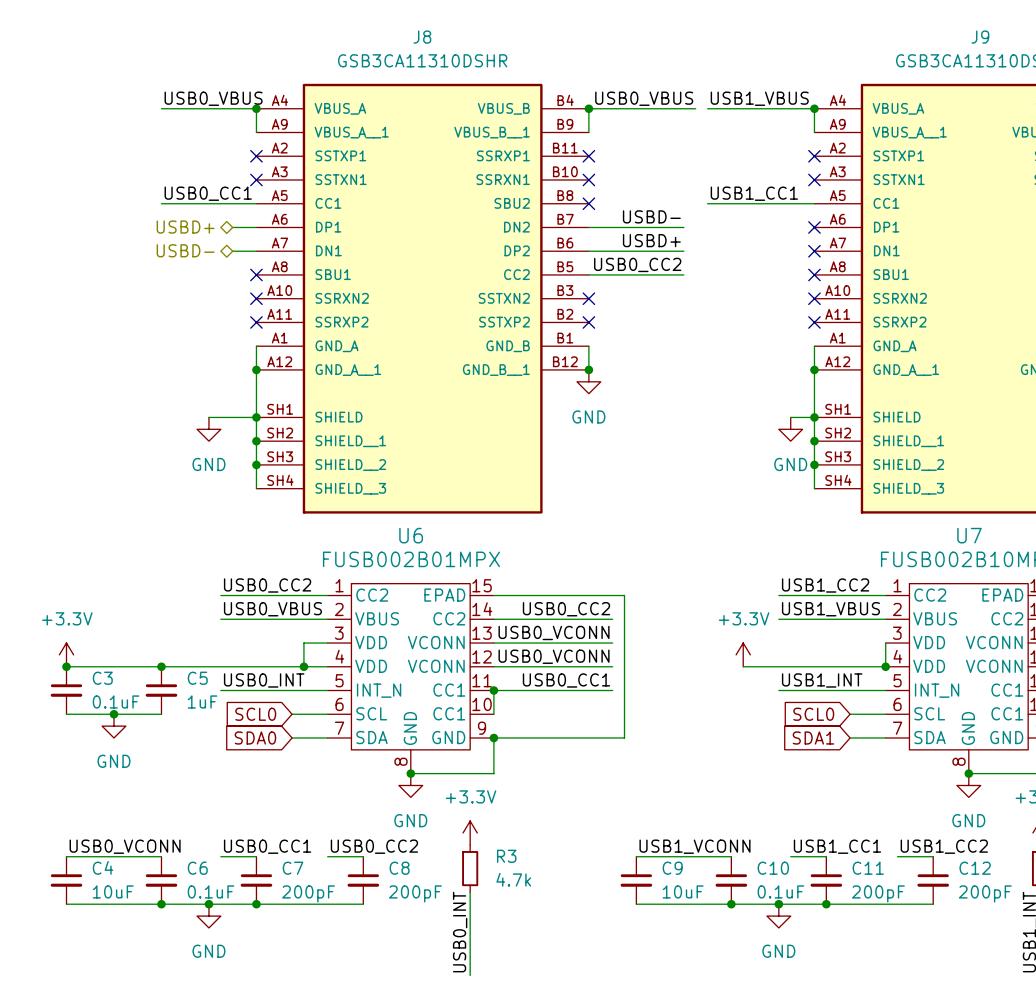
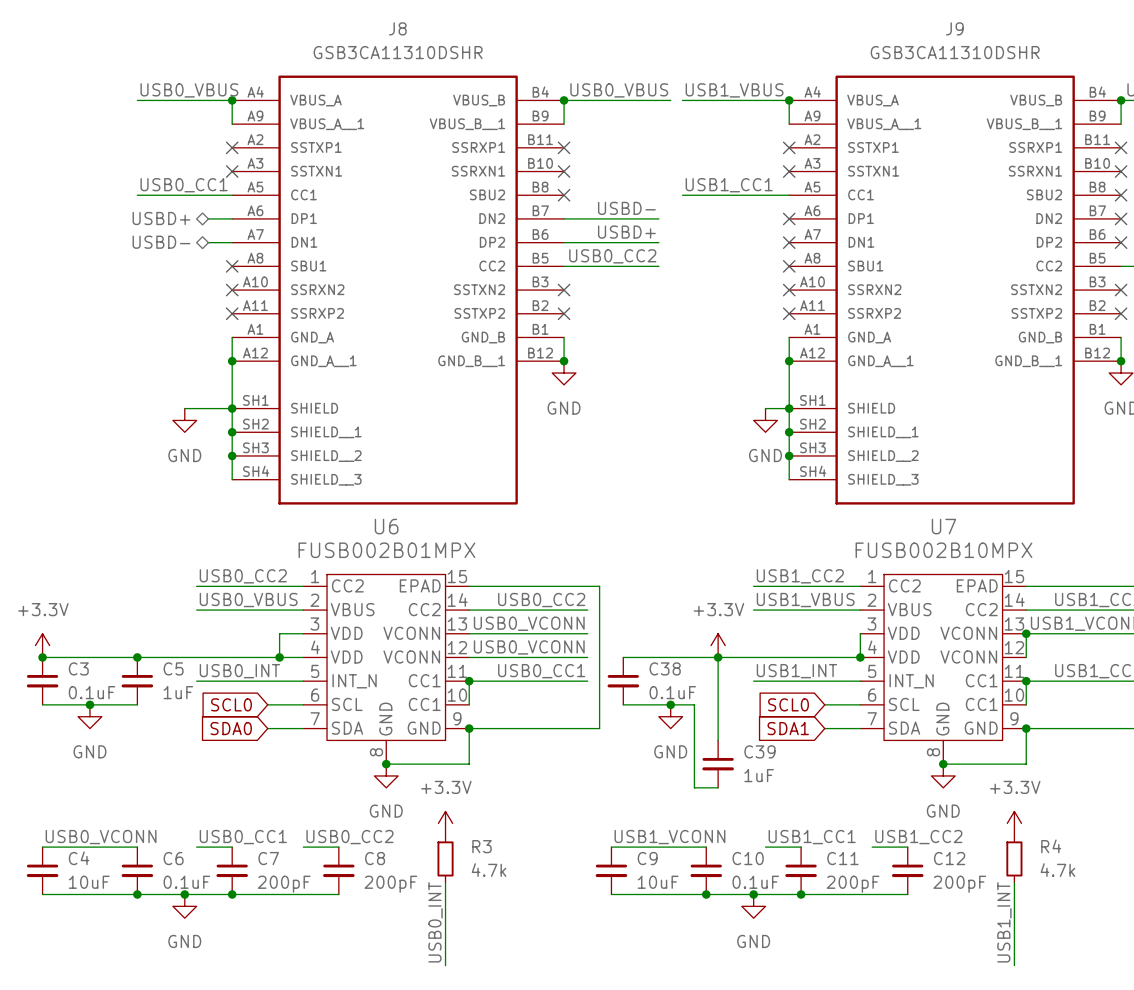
wire: none -> (623, 657) (718, 657) (718, 740)
junction: none -> (718, 657)
C38: none -> 0.1uF (623, 681)
wire: none -> (623, 704) (694, 704) (694, 787) (718, 787)
junction: none -> (670, 704)
power symbol: none -> GND (670, 716)
C39: none -> 1uF (718, 764)

